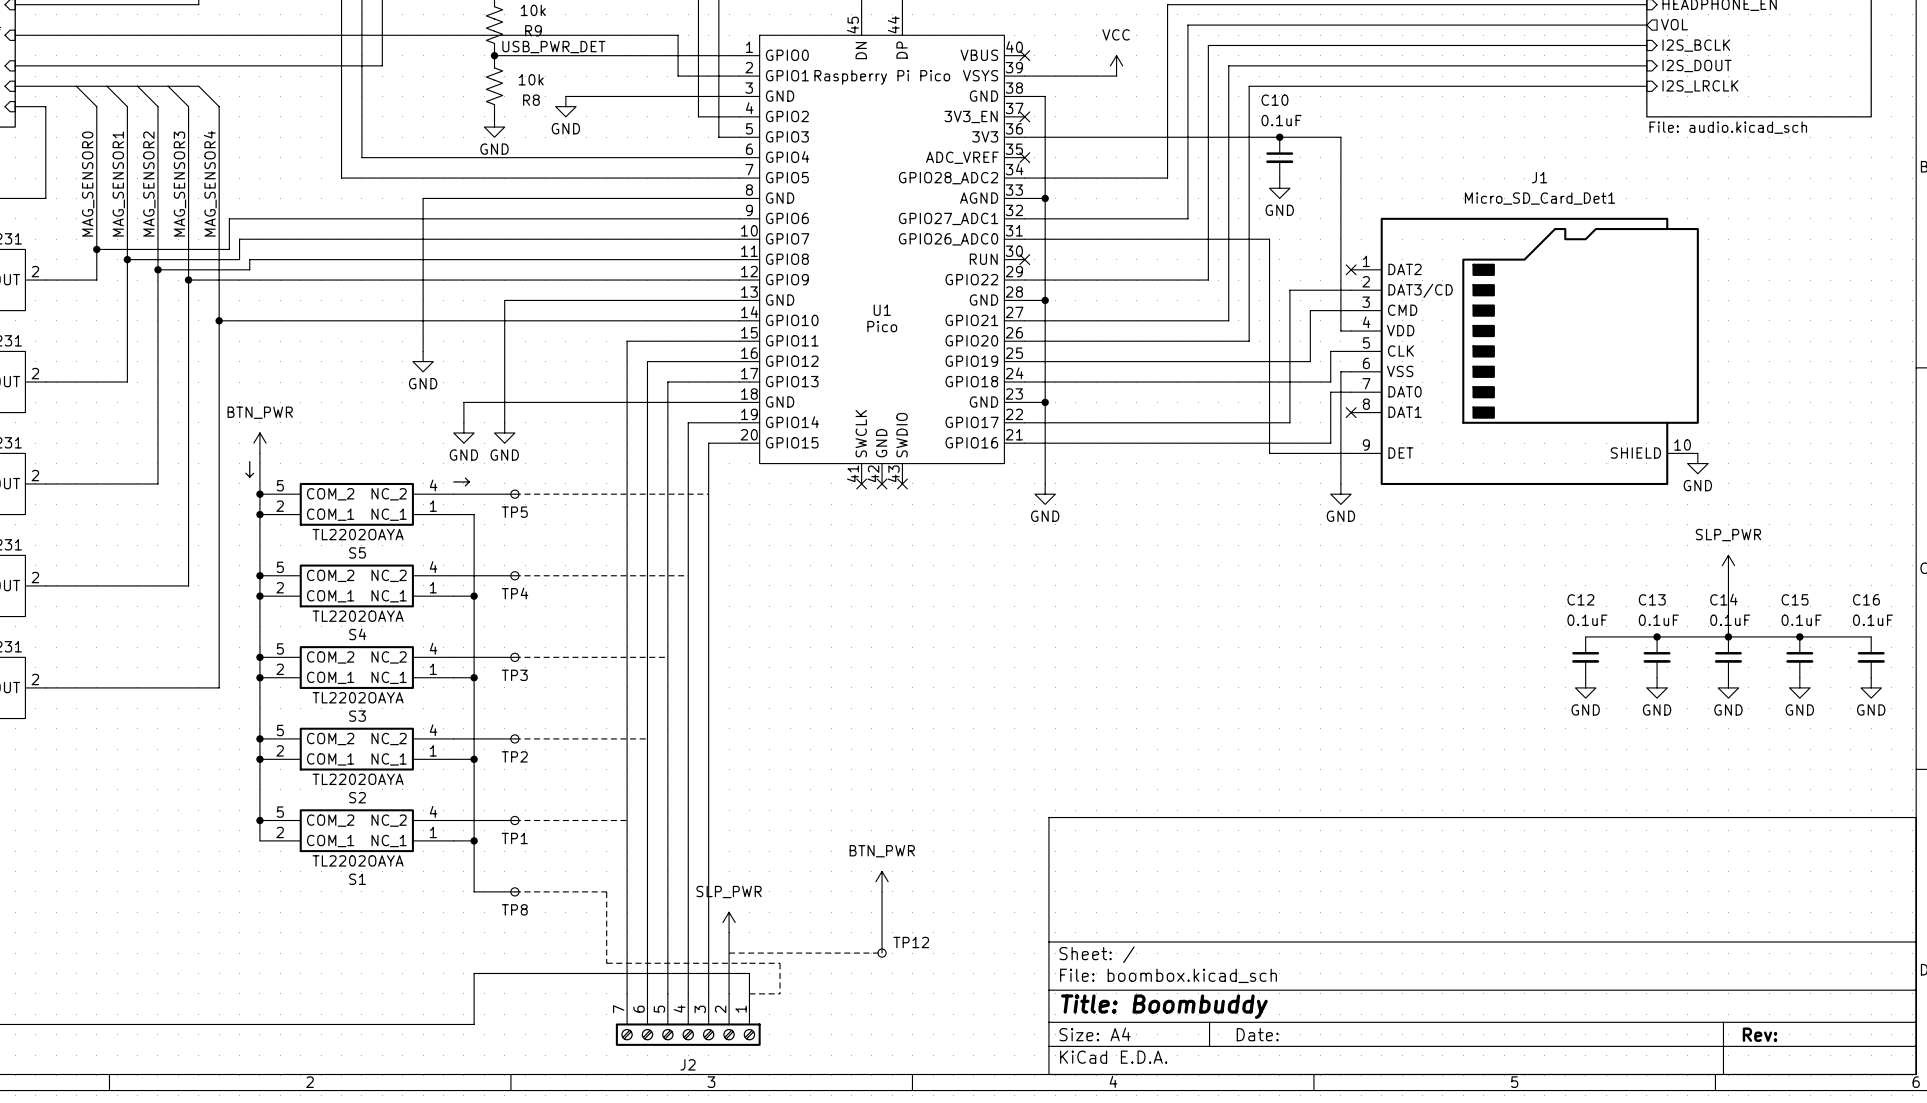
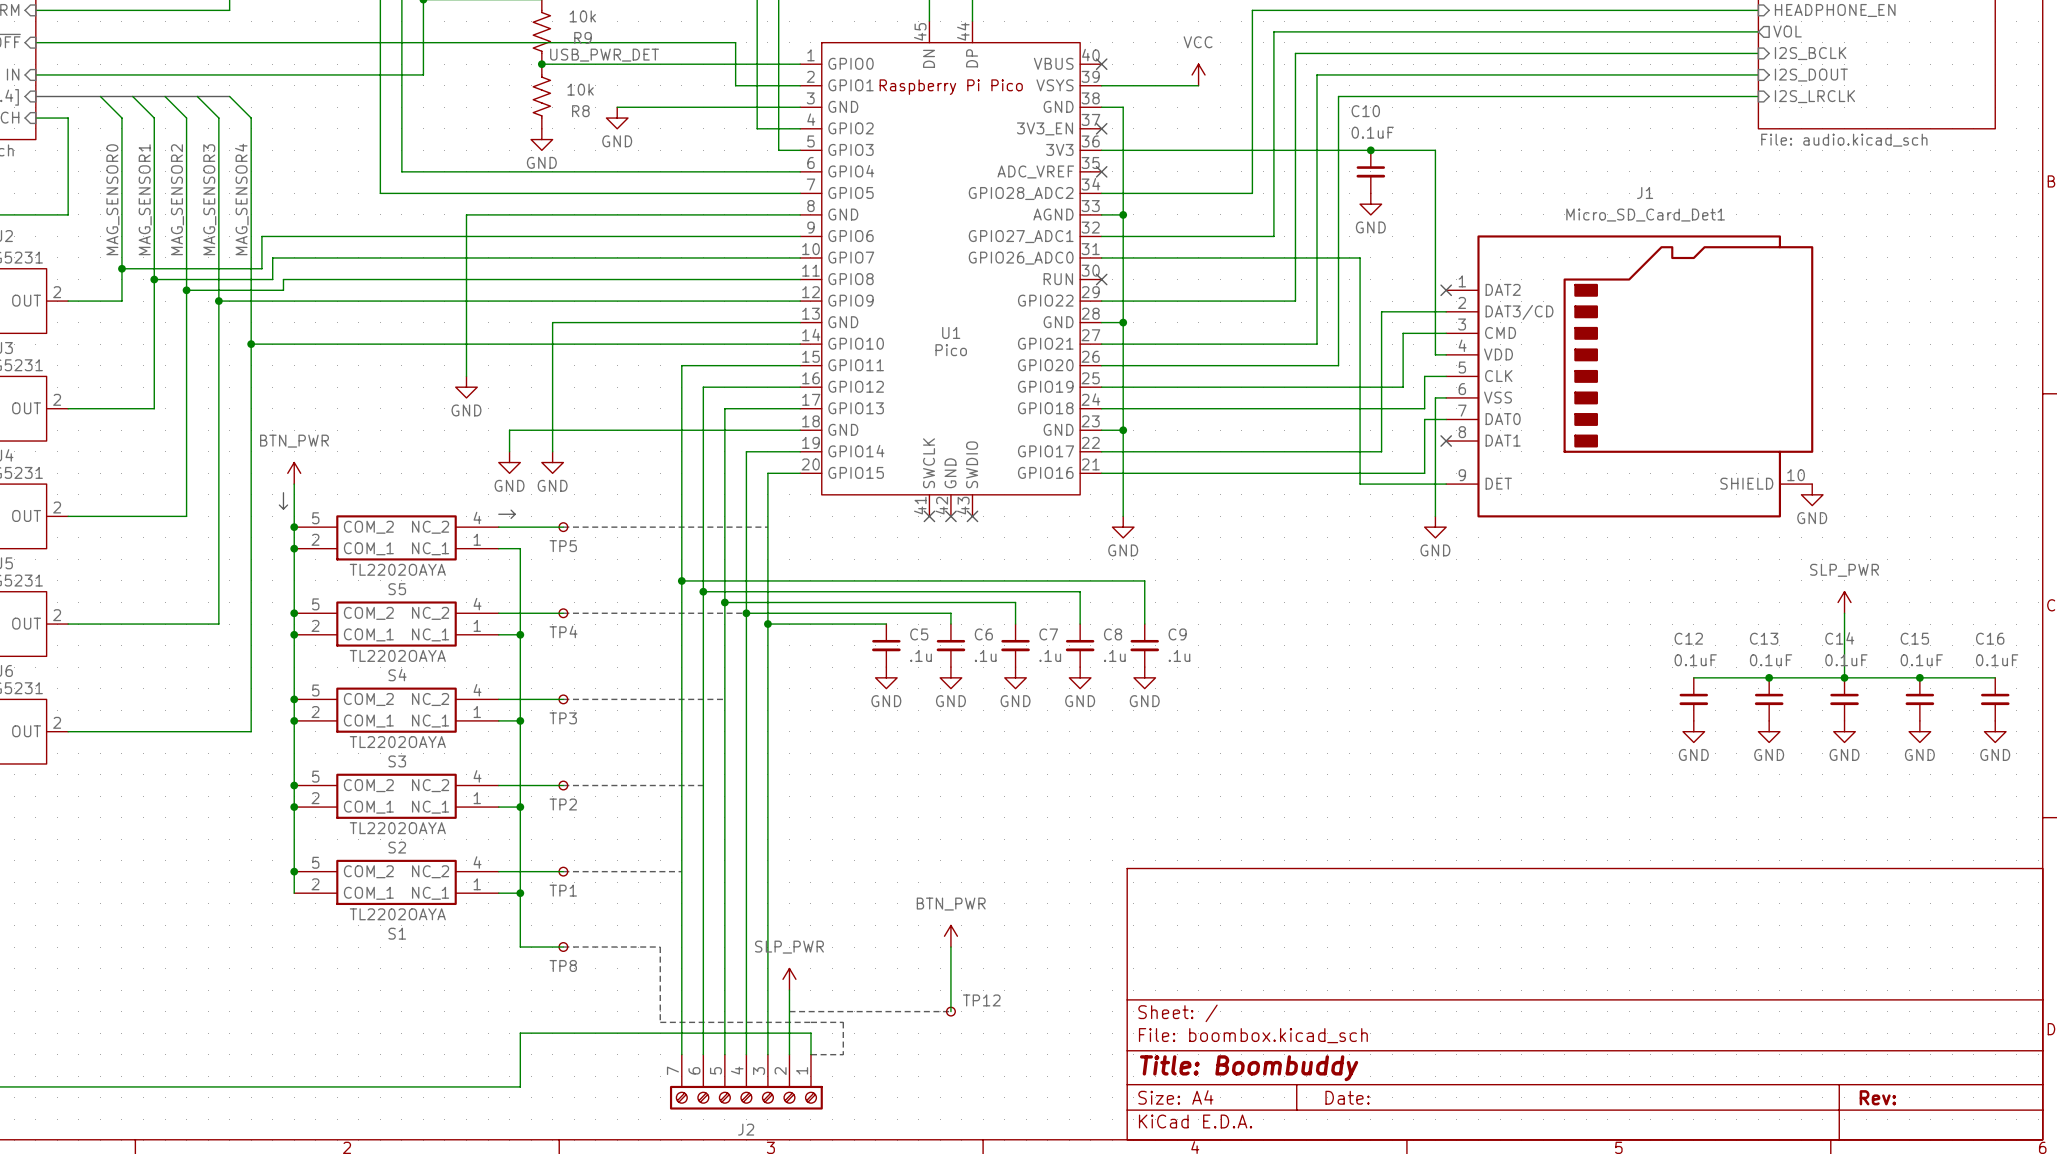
wire: none -> (681, 580) (1144, 580) (1144, 624)
junction: none -> (681, 580)
wire: none -> (703, 591) (1080, 591) (1080, 624)
junction: none -> (703, 591)
wire: none -> (724, 602) (1015, 602) (1015, 624)
junction: none -> (724, 602)
wire: none -> (746, 613) (950, 613) (950, 624)
junction: none -> (746, 613)
wire: none -> (767, 624) (886, 624)
junction: none -> (767, 624)
C5: none -> .1u (886, 645)
C6: none -> .1u (950, 645)
C7: none -> .1u (1015, 645)
C8: none -> .1u (1080, 645)
C9: none -> .1u (1144, 645)
power symbol: none -> GND (886, 677)
power symbol: none -> GND (950, 677)
power symbol: none -> GND (1015, 677)
power symbol: none -> GND (1080, 677)
power symbol: none -> GND (1144, 677)

